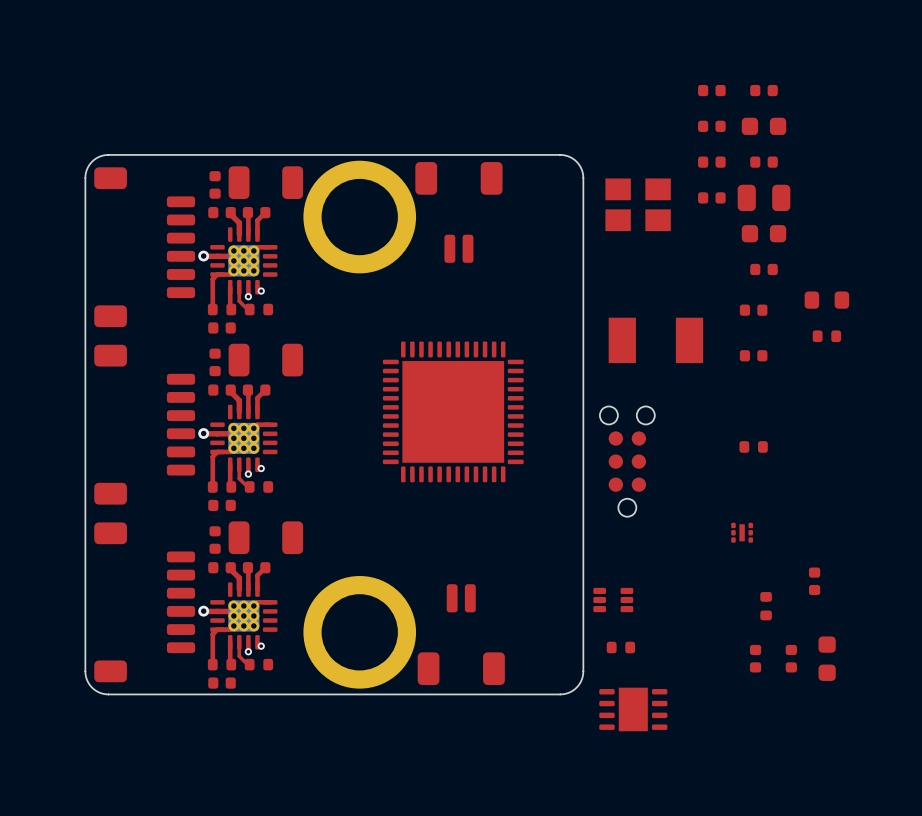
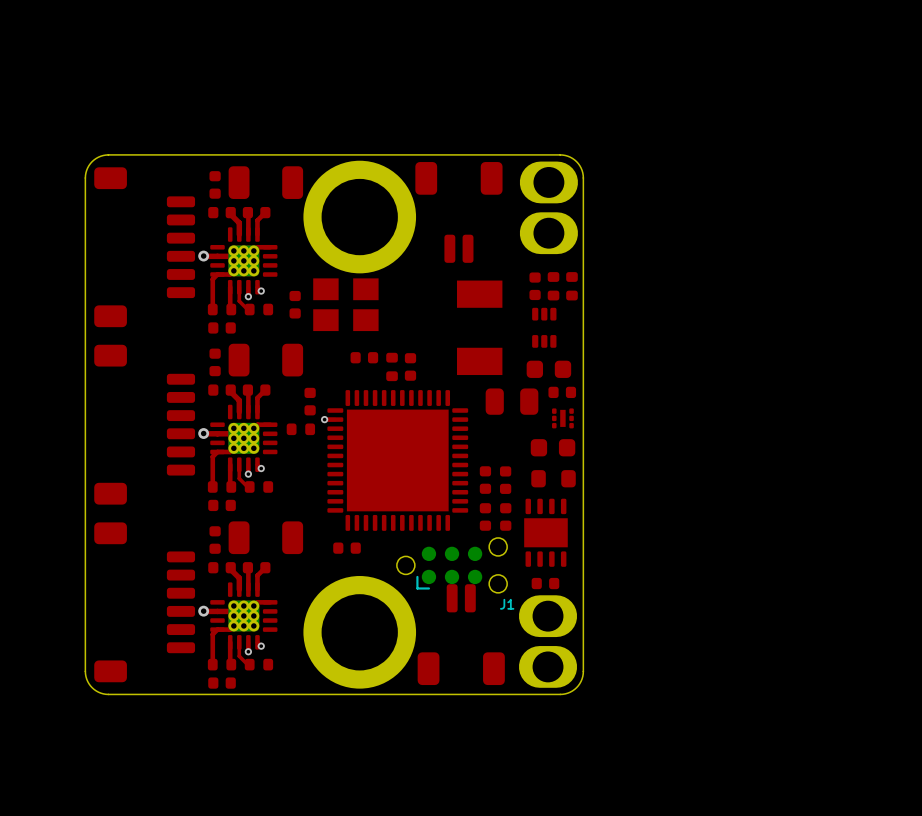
part: (711, 90) -> none
part: (763, 90) -> none
part: (711, 126) -> none
part: (763, 126) -> none
part: (711, 162) -> none
part: (763, 162) -> none
part: (711, 197) -> none
part position: (763, 197) -> (512, 401)
part position: (638, 204) -> (345, 304)
part: none -> (548, 207)
part: (763, 233) -> none
part: (763, 269) -> none
part: none -> (535, 286)
part: none -> (553, 286)
part: none -> (571, 286)
part position: (826, 300) -> (553, 478)
part: none -> (295, 304)
part: (753, 310) -> none
part: (826, 336) -> none
part rotation: 0° (655, 340) -> 90° clockwise (479, 327)
part position: (655, 340) -> (479, 327)
part: (753, 355) -> none
part: none -> (364, 357)
part: none -> (392, 366)
part: none -> (410, 366)
part: none -> (548, 369)
part: none -> (562, 392)
part: none -> (310, 401)
part position: (453, 411) -> (397, 460)
via: none -> (324, 419)
part: none -> (300, 429)
part: (753, 446) -> none
part: none -> (553, 447)
J1 side: top (627, 461) -> bottom (452, 565)
part: none -> (485, 480)
part: none -> (505, 480)
part: none -> (485, 516)
part: none -> (505, 516)
part position: (742, 532) -> (562, 418)
part: none -> (347, 548)
part: (814, 581) -> none
part: none -> (545, 583)
part rotation: 0° (613, 600) -> 90° clockwise (544, 327)
part position: (613, 600) -> (544, 327)
part: (766, 606) -> none
part: none -> (548, 641)
part: (620, 647) -> none
part: (755, 658) -> none
part: (791, 658) -> none
part: (827, 658) -> none
part rotation: 0° (633, 709) -> 90° clockwise (545, 532)
part position: (633, 709) -> (545, 532)

